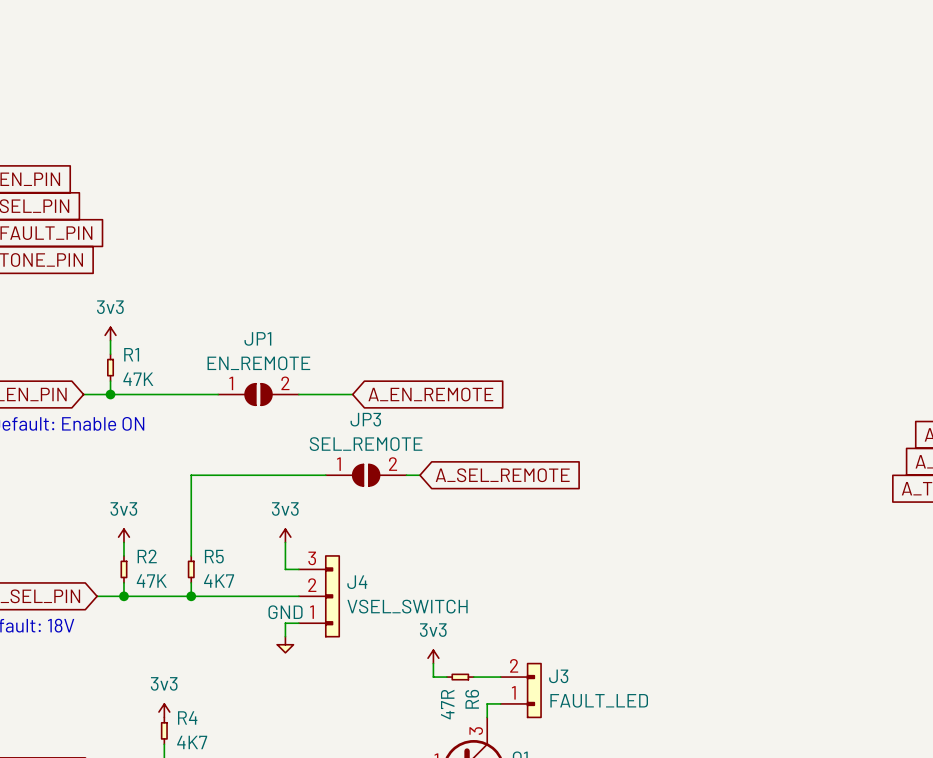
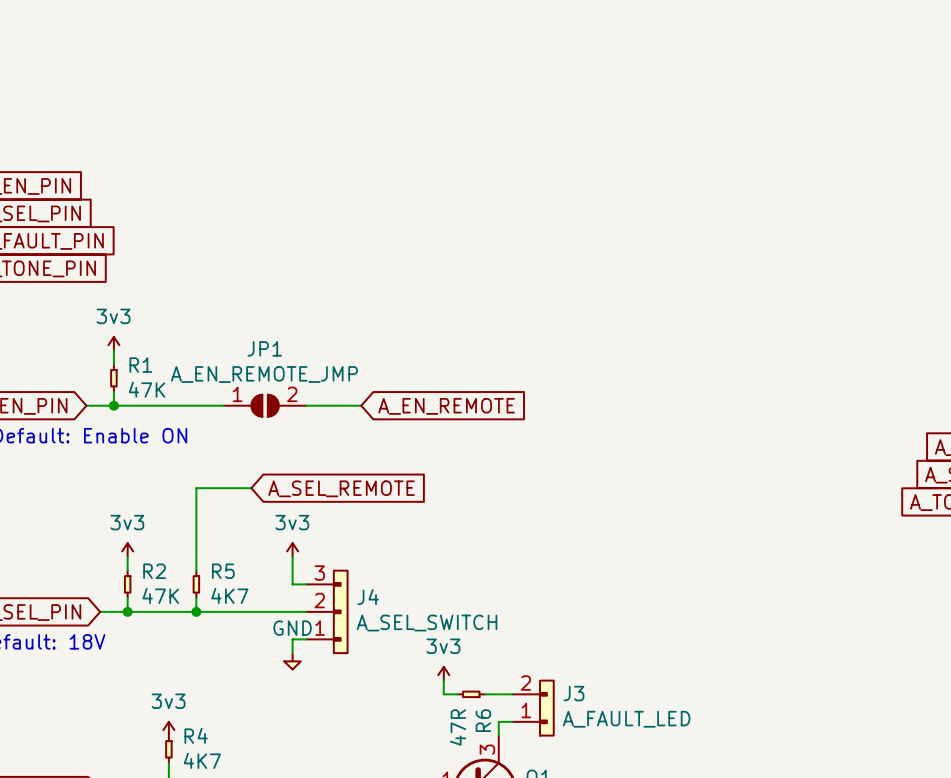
JP1 value: EN_REMOTE (258, 363) -> A_EN_REMOTE_JMP (264, 374)
wire: (245, 475) (325, 475) -> none
JP3: SEL_REMOTE (366, 475) -> none
wire: (406, 475) (419, 475) -> none
global label position: A_SEL_REMOTE (502, 475) -> A_SEL_REMOTE (341, 488)
J4 value: VSEL_SWITCH (407, 606) -> A_SEL_SWITCH (427, 623)
J3 value: FAULT_LED (599, 700) -> A_FAULT_LED (626, 719)

